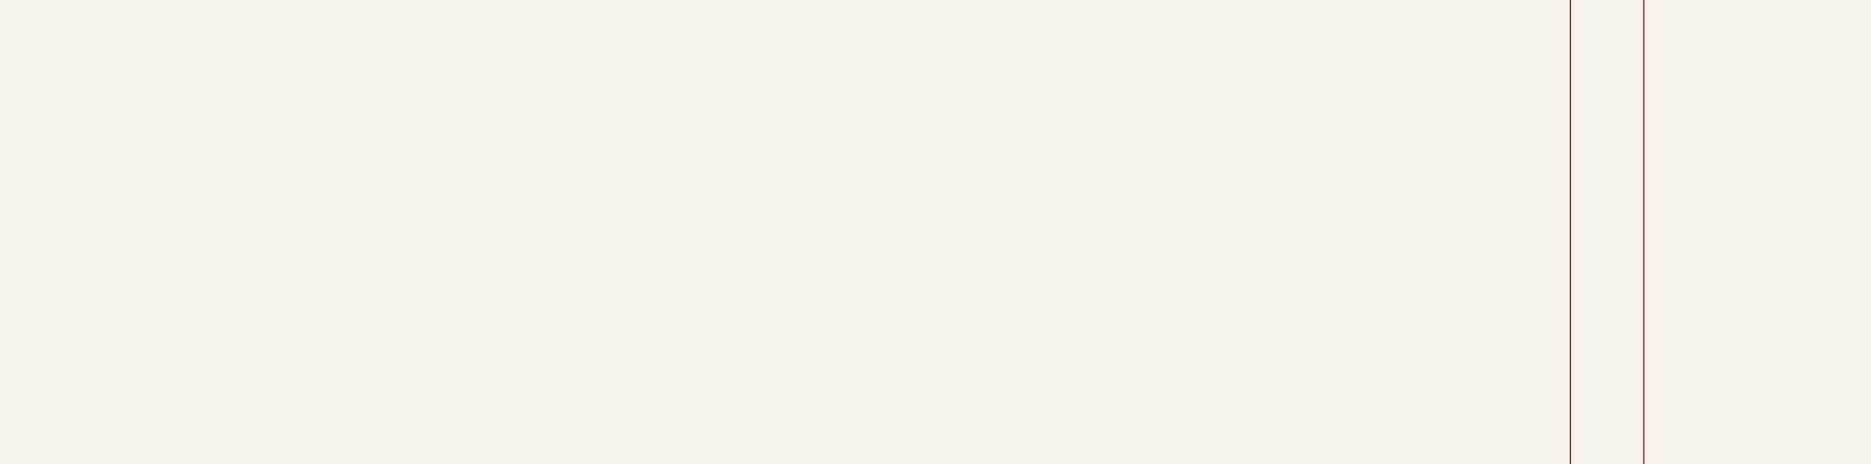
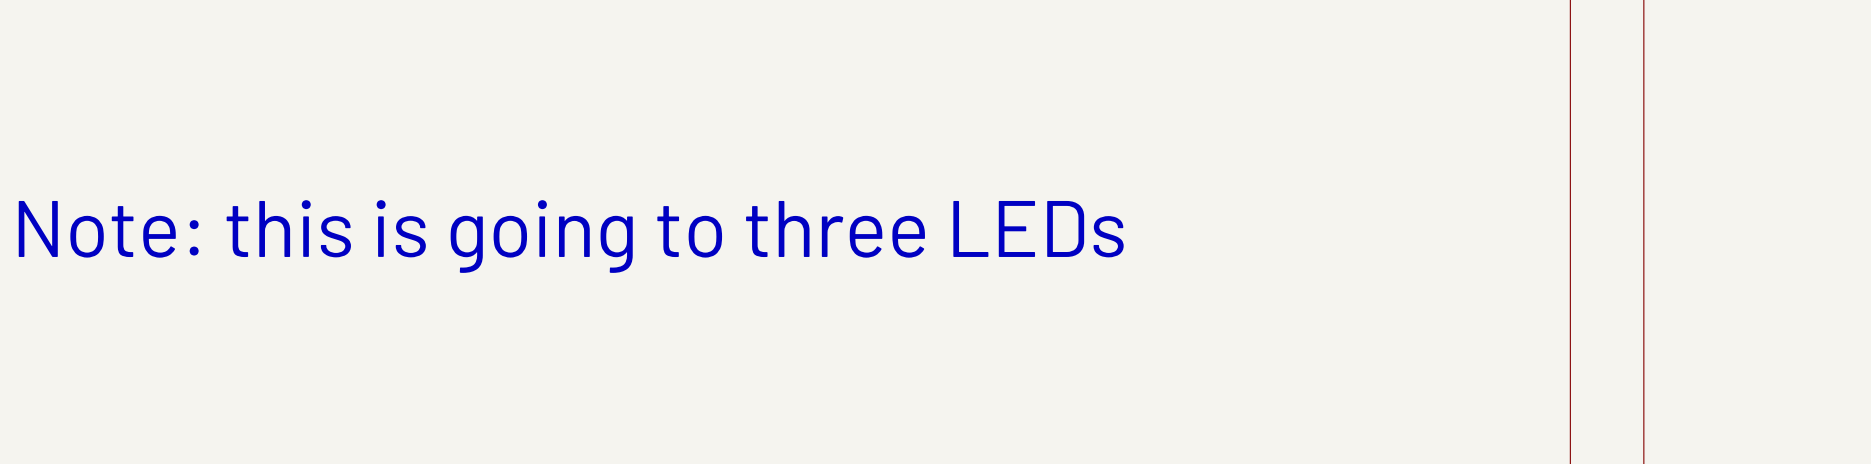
text: none -> Note: this is going to three LEDs (571, 236)

